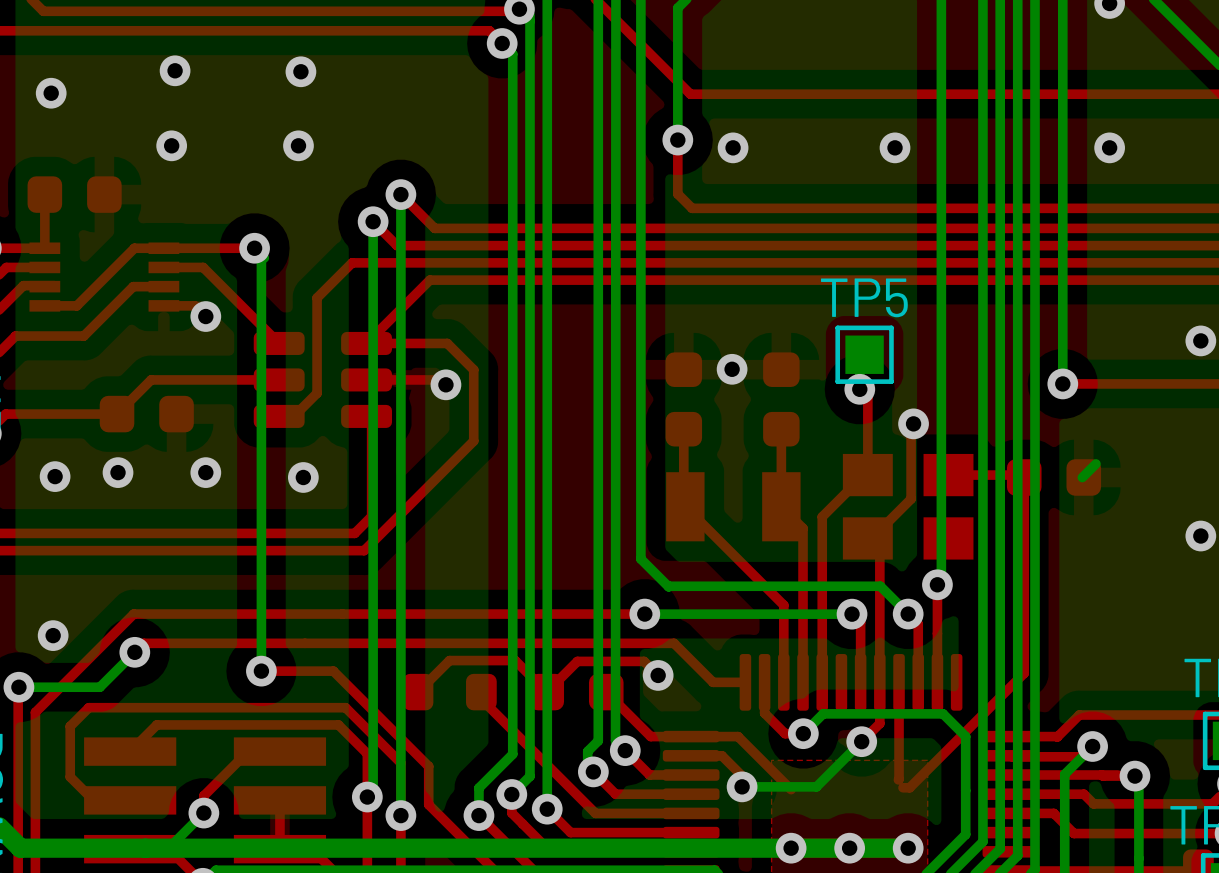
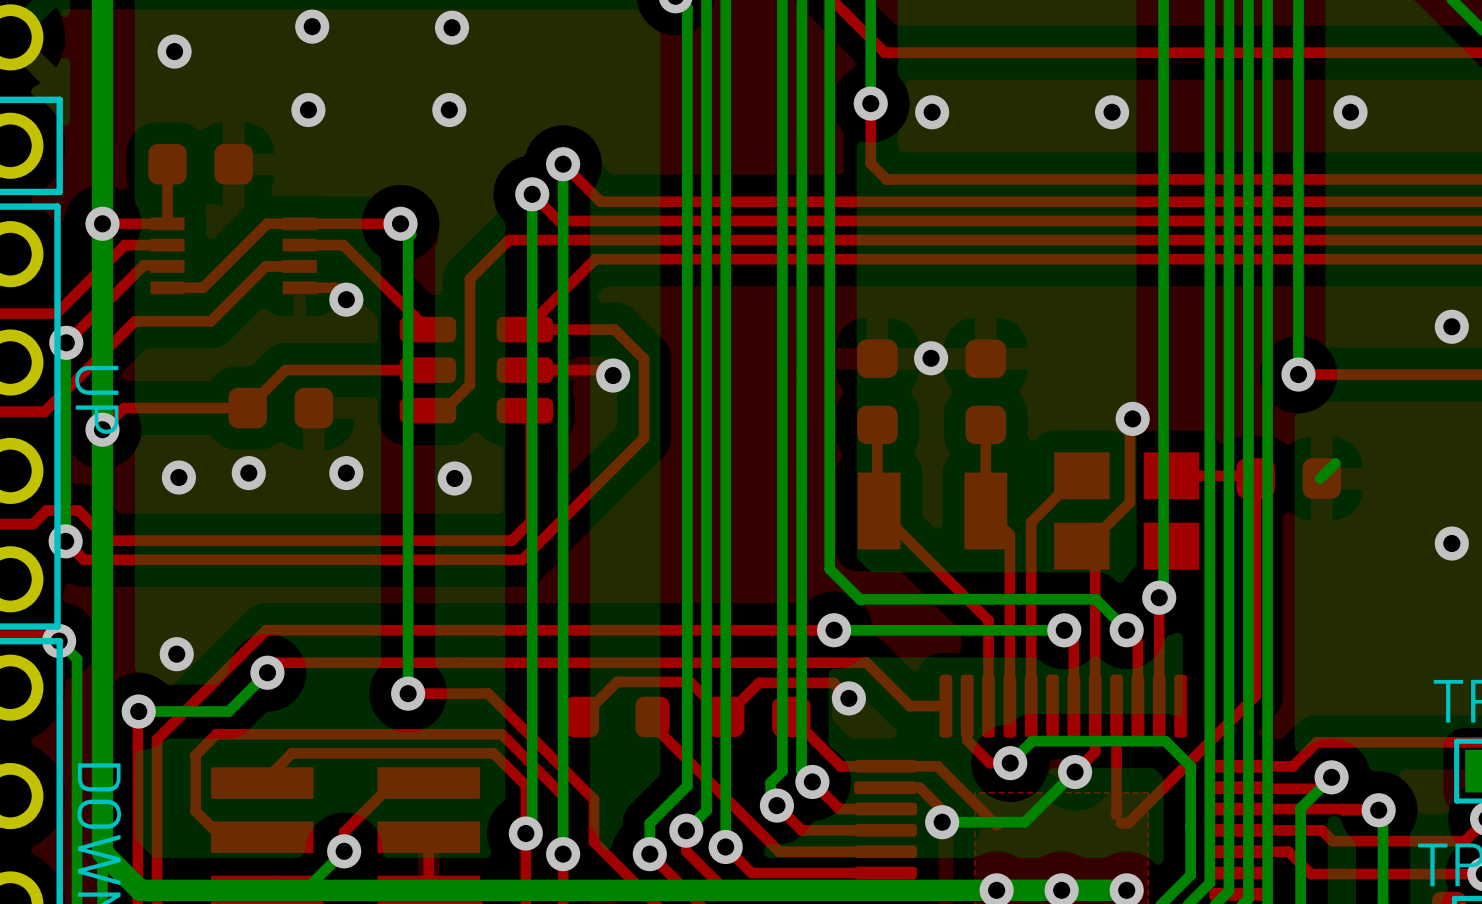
TP5: (864, 354) -> none
top track: (859, 389) (867, 397) (867, 475) -> none
via: (859, 389) -> none

